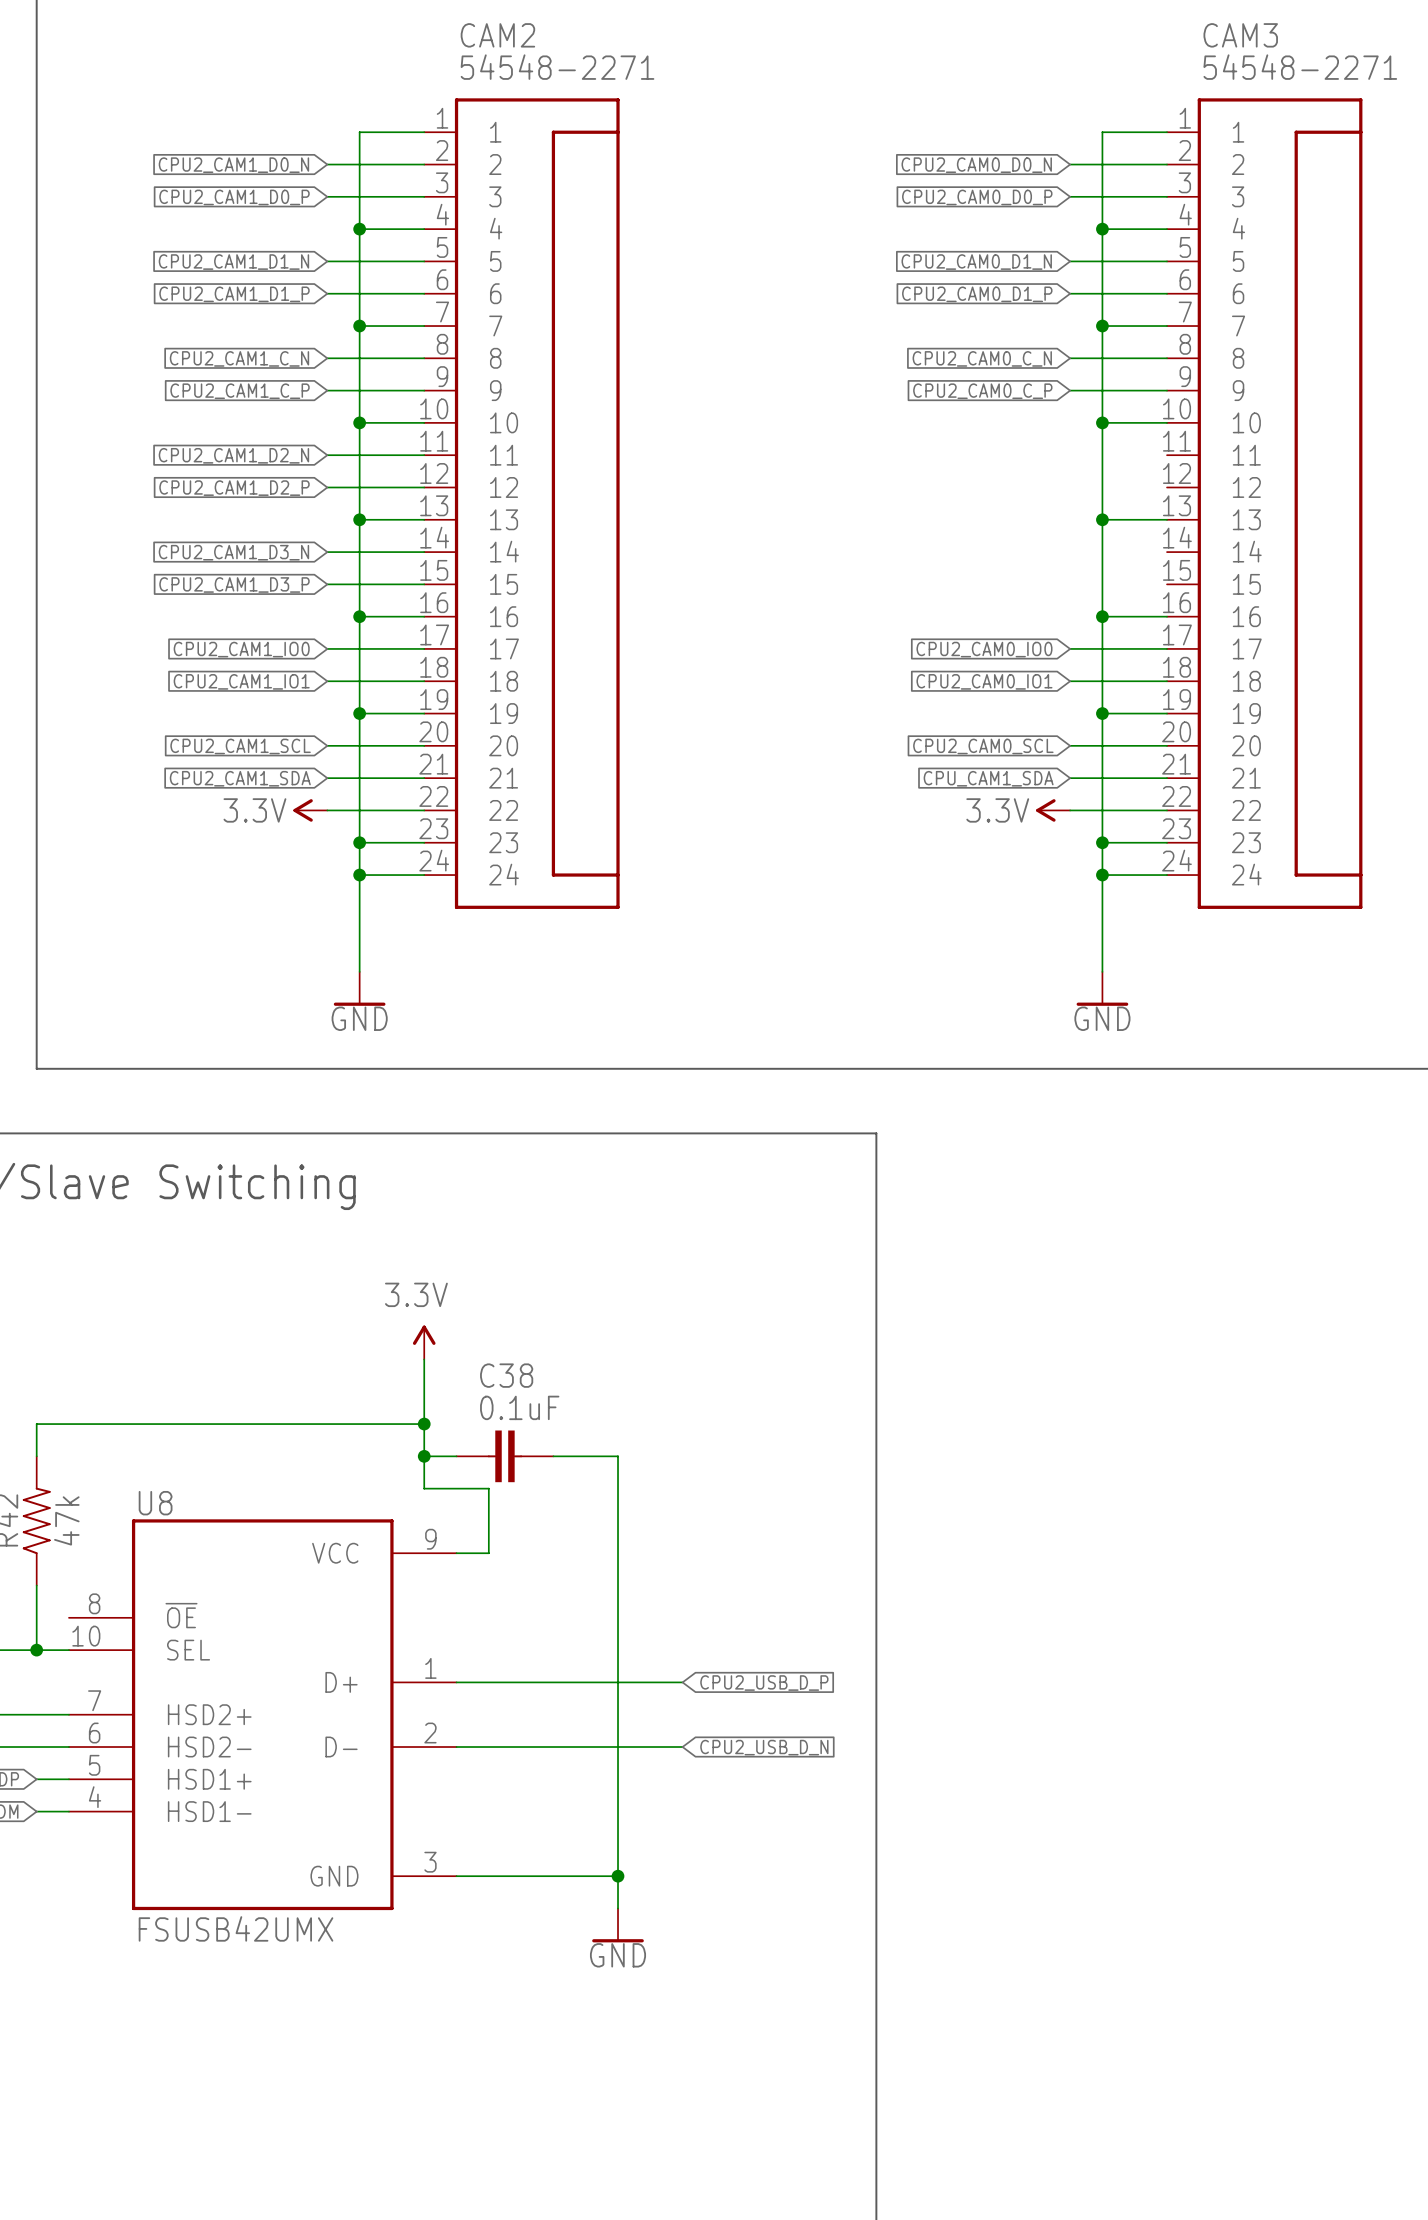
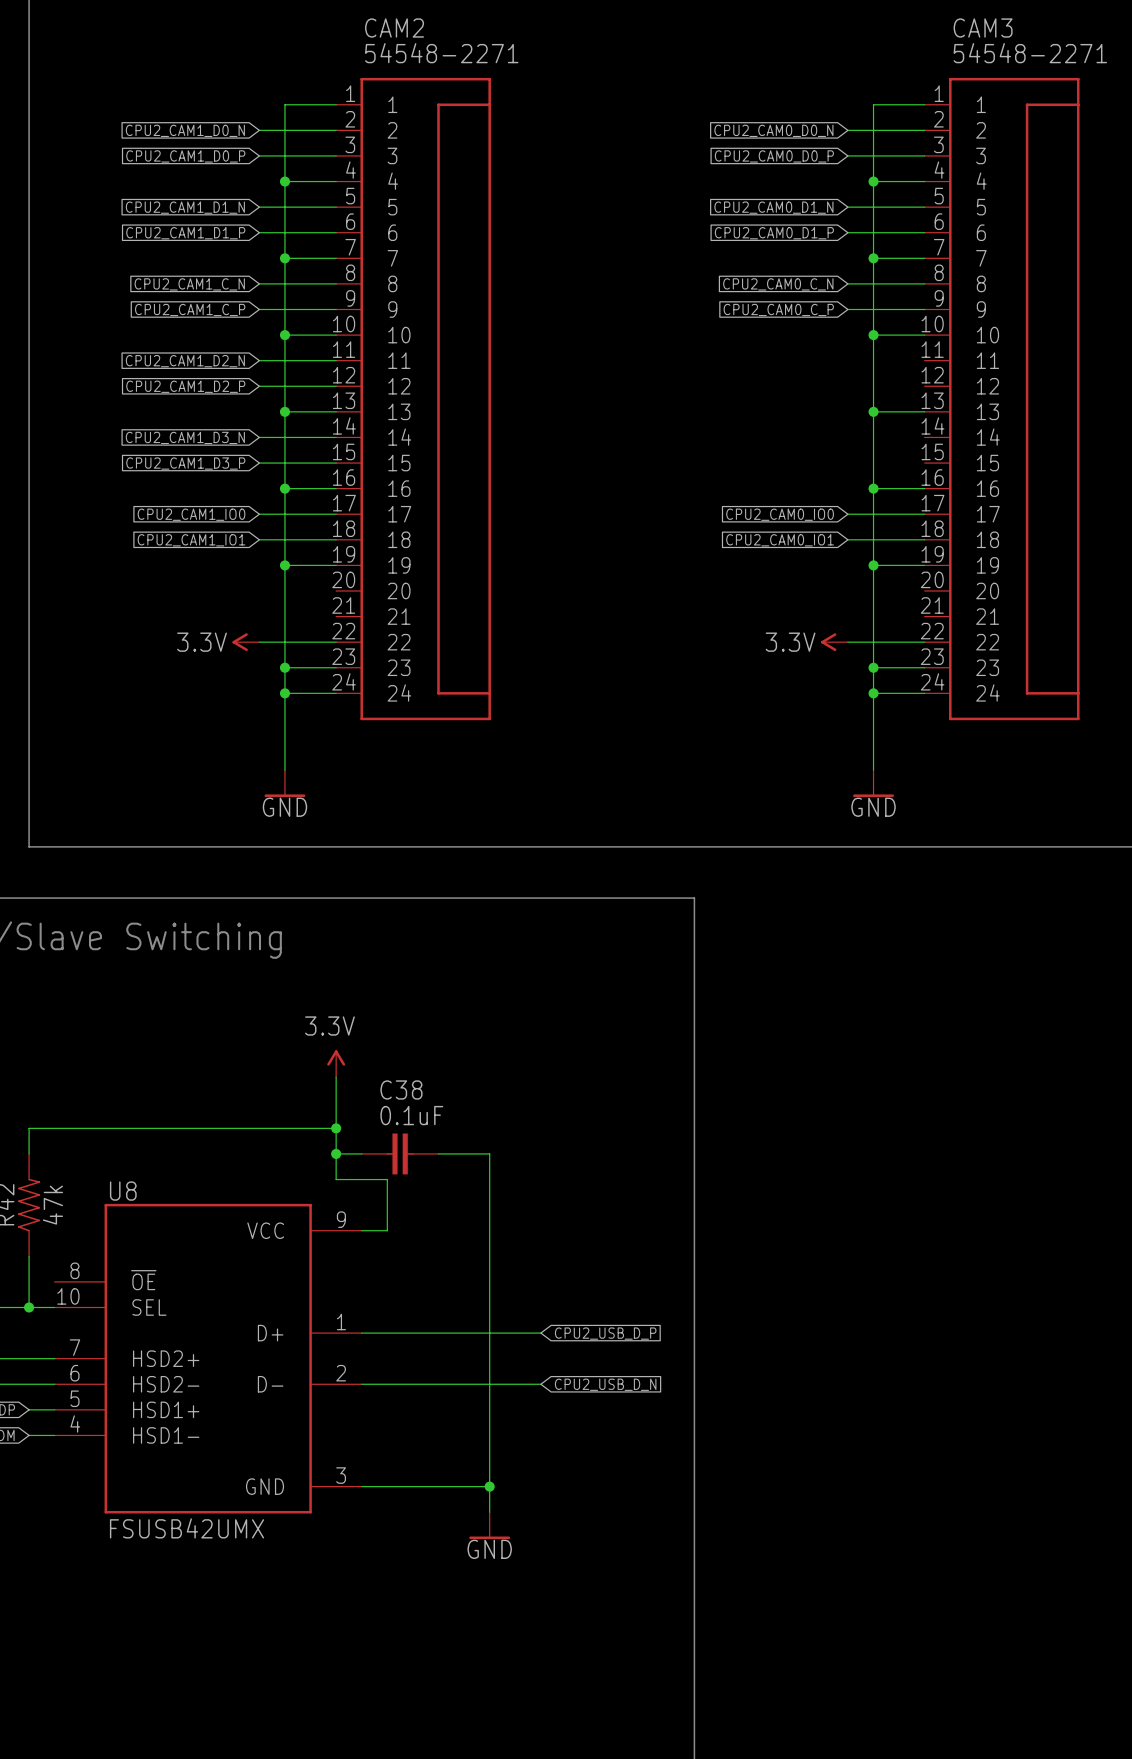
wire: (327, 745) (424, 745) -> none
wire: (1070, 745) (1167, 745) -> none
global label: CPU2_CAM1_SCL (240, 746) -> none
global label: CPU2_CAM0_SCL (983, 746) -> none
global label: CPU2_CAM1_SDA (240, 778) -> none
wire: (327, 778) (424, 778) -> none
global label: CPU_CAM1_SDA (988, 778) -> none
wire: (1070, 778) (1167, 778) -> none

